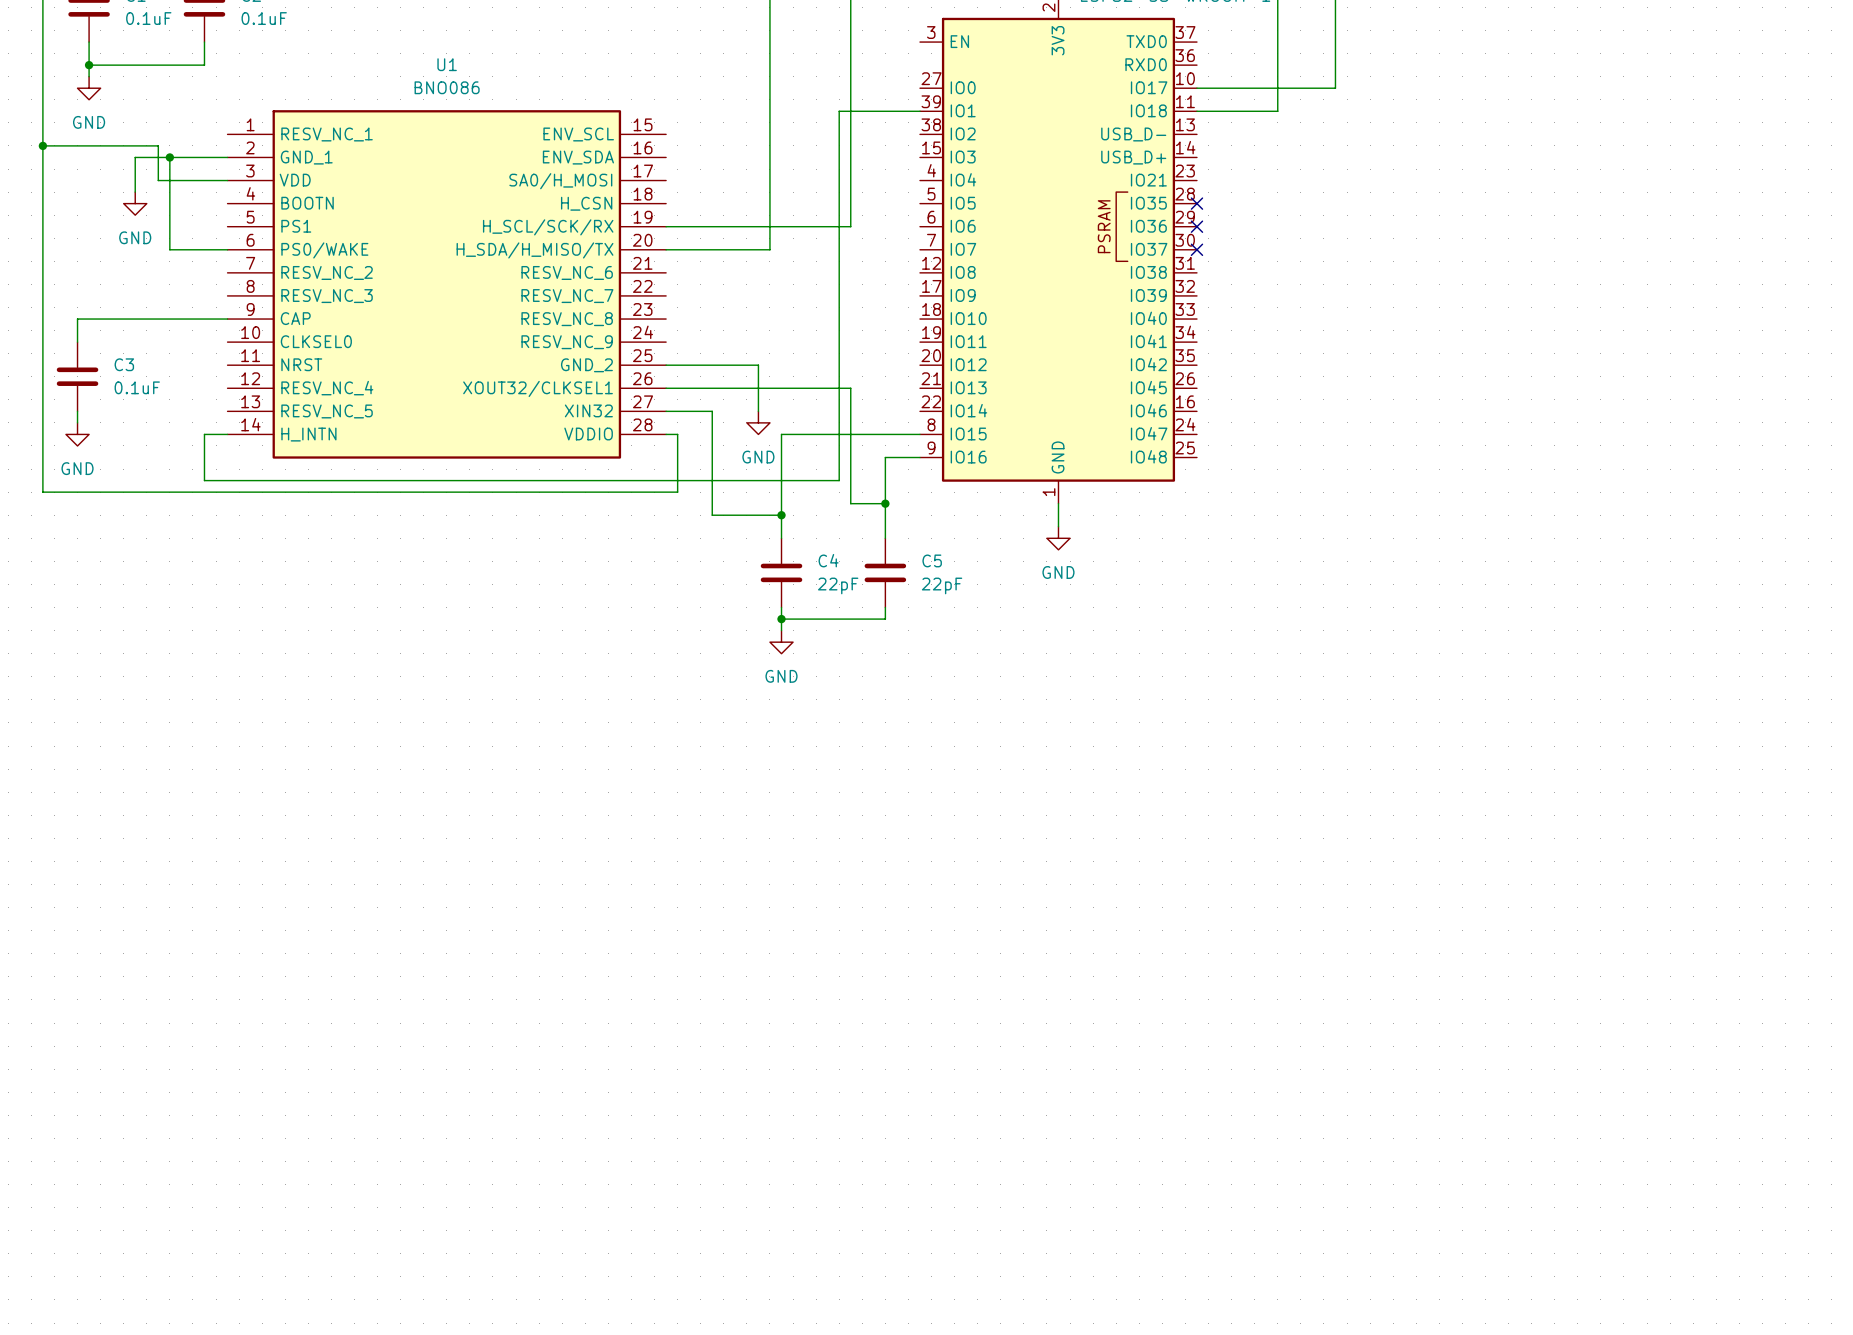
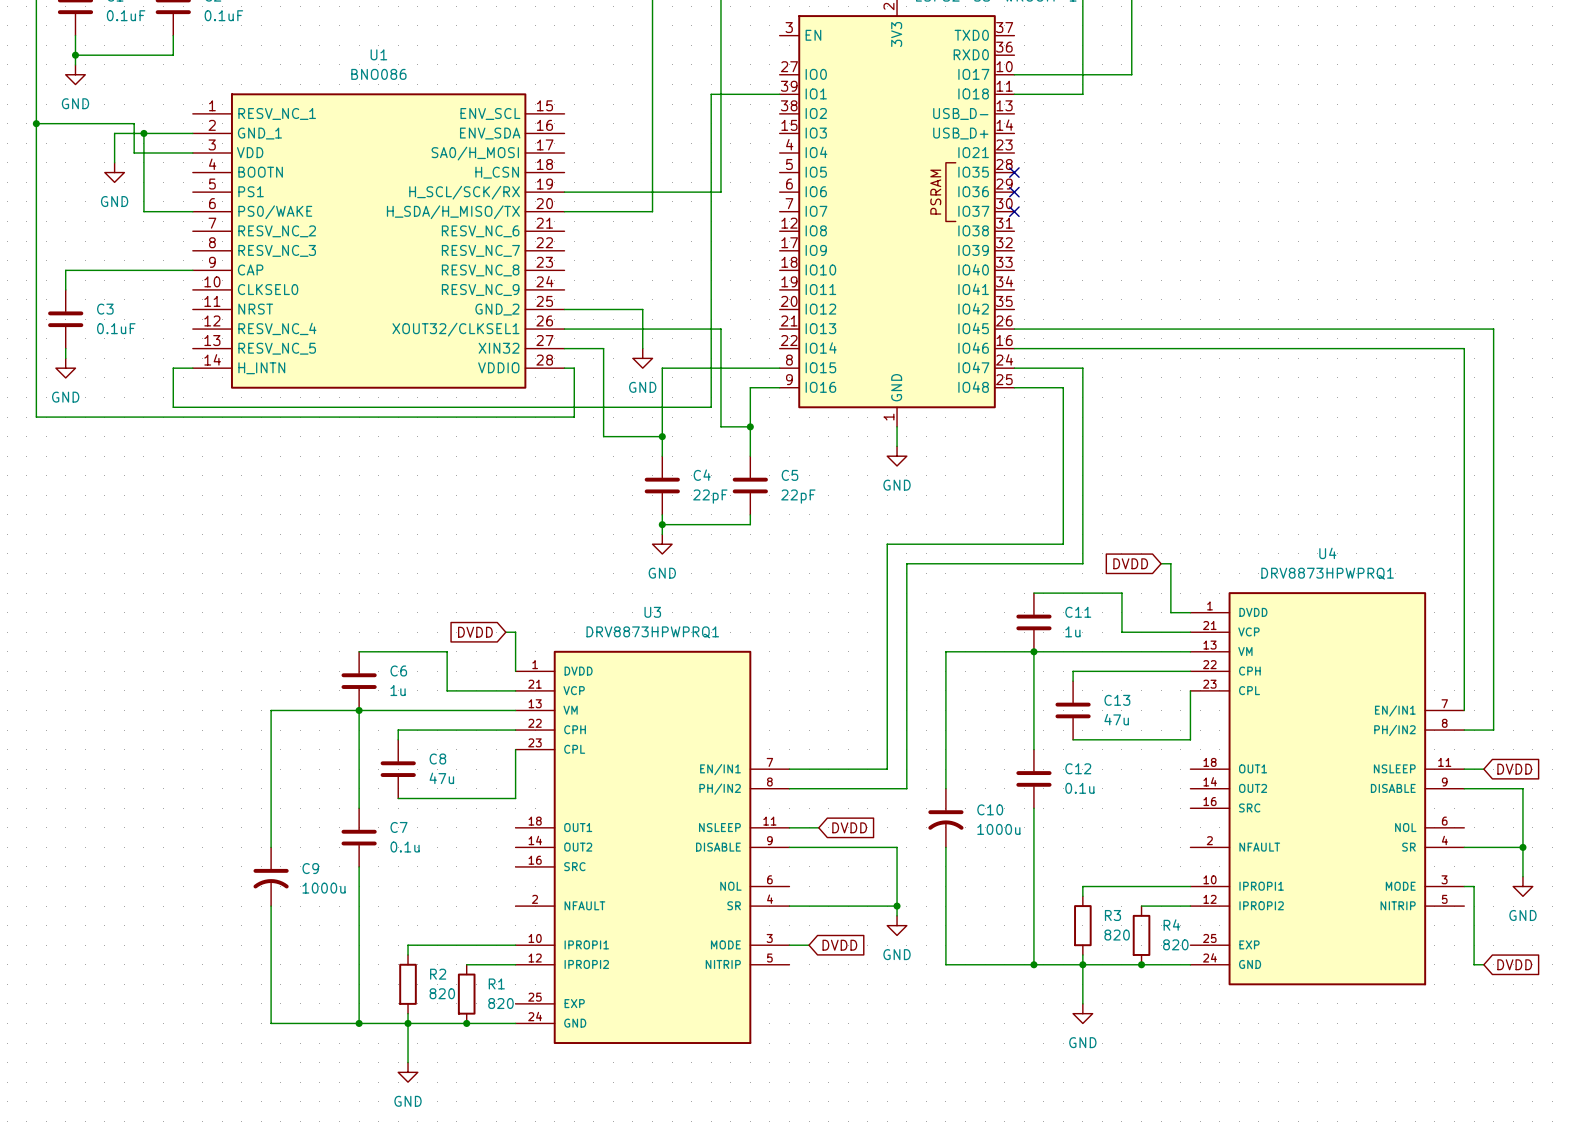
wire: none -> (1014, 329) (1493, 329) (1493, 730) (1464, 730)
wire: none -> (1014, 348) (1464, 348) (1464, 710)
wire: none -> (1014, 368) (1082, 368) (1082, 563) (906, 563) (906, 788) (789, 788)
wire: none -> (1014, 387) (1063, 387) (1063, 544) (887, 544) (887, 769) (789, 769)
global label: none -> DVDD (1130, 563)
wire: none -> (1161, 563) (1170, 563) (1170, 612) (1190, 612)
wire: none -> (1033, 593) (1121, 593) (1121, 632) (1190, 632)
C11: none -> 1u (1033, 622)
global label: none -> DVDD (475, 632)
wire: none -> (505, 632) (515, 632) (515, 671)
wire: none -> (359, 651) (447, 651) (447, 690) (515, 690)
wire: none -> (1033, 651) (1033, 749)
junction: none -> (1033, 651)
wire: none -> (1190, 651) (945, 651) (945, 788)
wire: none -> (1190, 671) (1073, 671) (1073, 681)
C6: none -> 1u (359, 681)
wire: none -> (1190, 690) (1190, 739) (1073, 739)
wire: none -> (359, 710) (359, 808)
junction: none -> (359, 710)
wire: none -> (515, 710) (271, 710) (271, 847)
C13: none -> 47u (1073, 710)
wire: none -> (515, 730) (398, 730) (398, 739)
wire: none -> (515, 749) (515, 798) (398, 798)
C8: none -> 47u (398, 769)
wire: none -> (1464, 769) (1483, 769)
global label: none -> DVDD (1514, 769)
C12: none -> 0.1u (1033, 778)
U4: none -> DRV8873HPWPRQ1 (1327, 788)
wire: none -> (1464, 788) (1522, 788) (1522, 876)
wire: none -> (1033, 808) (1033, 964)
C10: none -> 1000u (945, 818)
wire: none -> (789, 827) (818, 827)
global label: none -> DVDD (849, 827)
C7: none -> 0.1u (359, 837)
U3: none -> DRV8873HPWPRQ1 (652, 847)
wire: none -> (789, 847) (897, 847) (897, 915)
wire: none -> (945, 847) (945, 964) (1190, 964)
wire: none -> (1464, 847) (1522, 847)
junction: none -> (1522, 847)
wire: none -> (359, 866) (359, 1023)
C9: none -> 1000u (271, 876)
wire: none -> (1190, 886) (1082, 886) (1082, 896)
wire: none -> (1464, 886) (1474, 886) (1474, 964) (1483, 964)
power symbol: none -> GND (1522, 886)
wire: none -> (271, 906) (271, 1023) (515, 1023)
wire: none -> (789, 906) (897, 906)
junction: none -> (897, 906)
wire: none -> (1141, 906) (1190, 906)
power symbol: none -> GND (897, 925)
R3: none -> 820 (1082, 925)
R4: none -> 820 (1141, 935)
wire: none -> (515, 945) (408, 945) (408, 954)
wire: none -> (789, 945) (809, 945)
global label: none -> DVDD (839, 945)
wire: none -> (1082, 954) (1082, 1003)
wire: none -> (466, 964) (515, 964)
junction: none -> (1033, 964)
junction: none -> (1082, 964)
junction: none -> (1141, 964)
global label: none -> DVDD (1514, 964)
R2: none -> 820 (408, 984)
R1: none -> 820 (466, 994)
wire: none -> (408, 1013) (408, 1062)
power symbol: none -> GND (1082, 1013)
junction: none -> (359, 1023)
junction: none -> (408, 1023)
junction: none -> (466, 1023)
power symbol: none -> GND (408, 1072)

